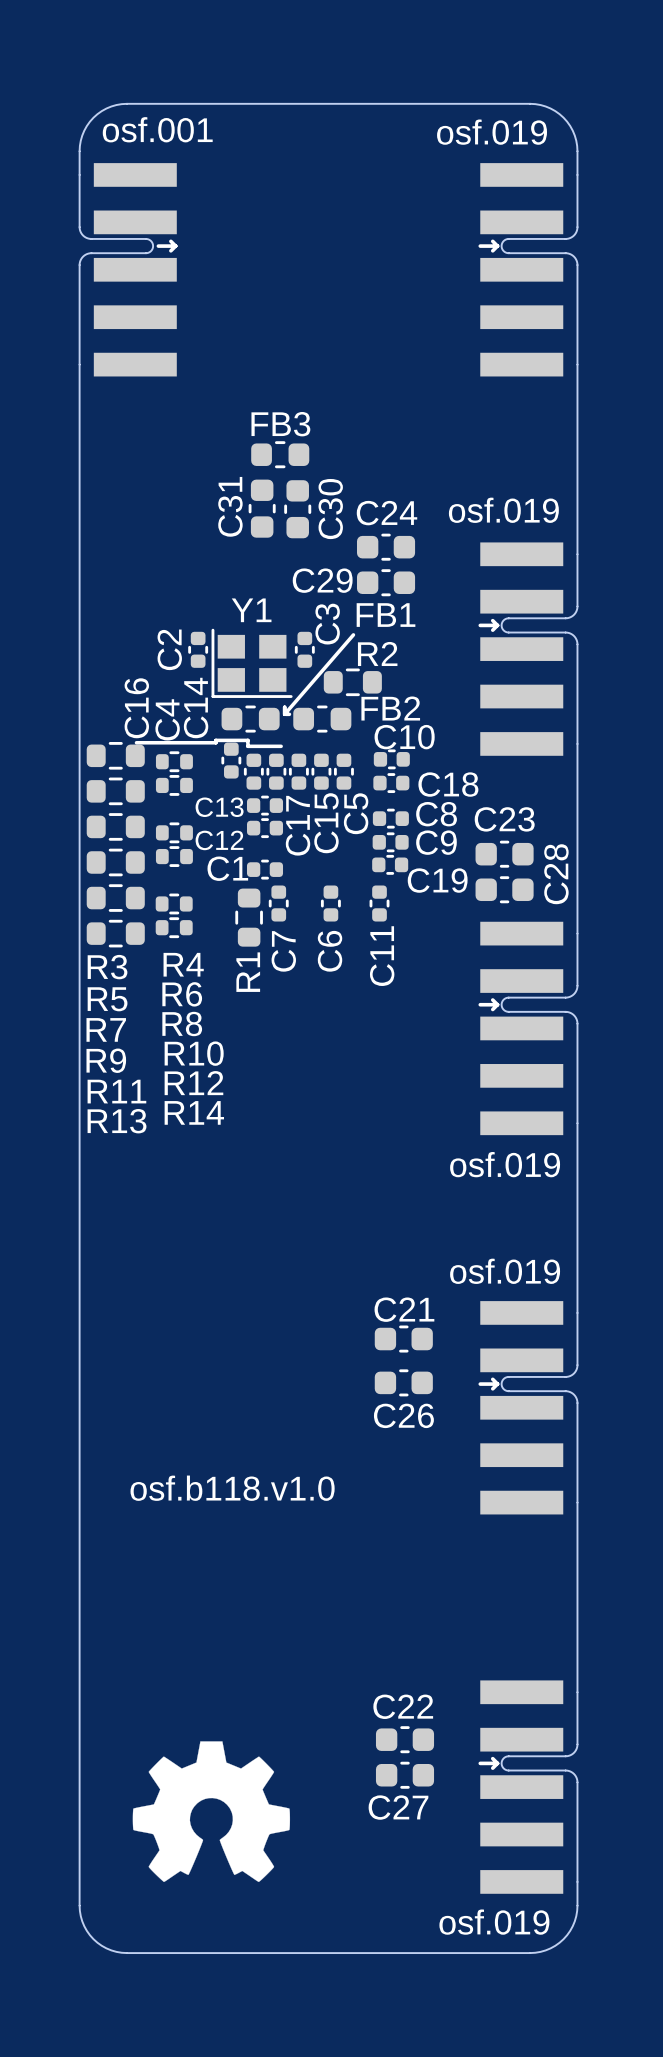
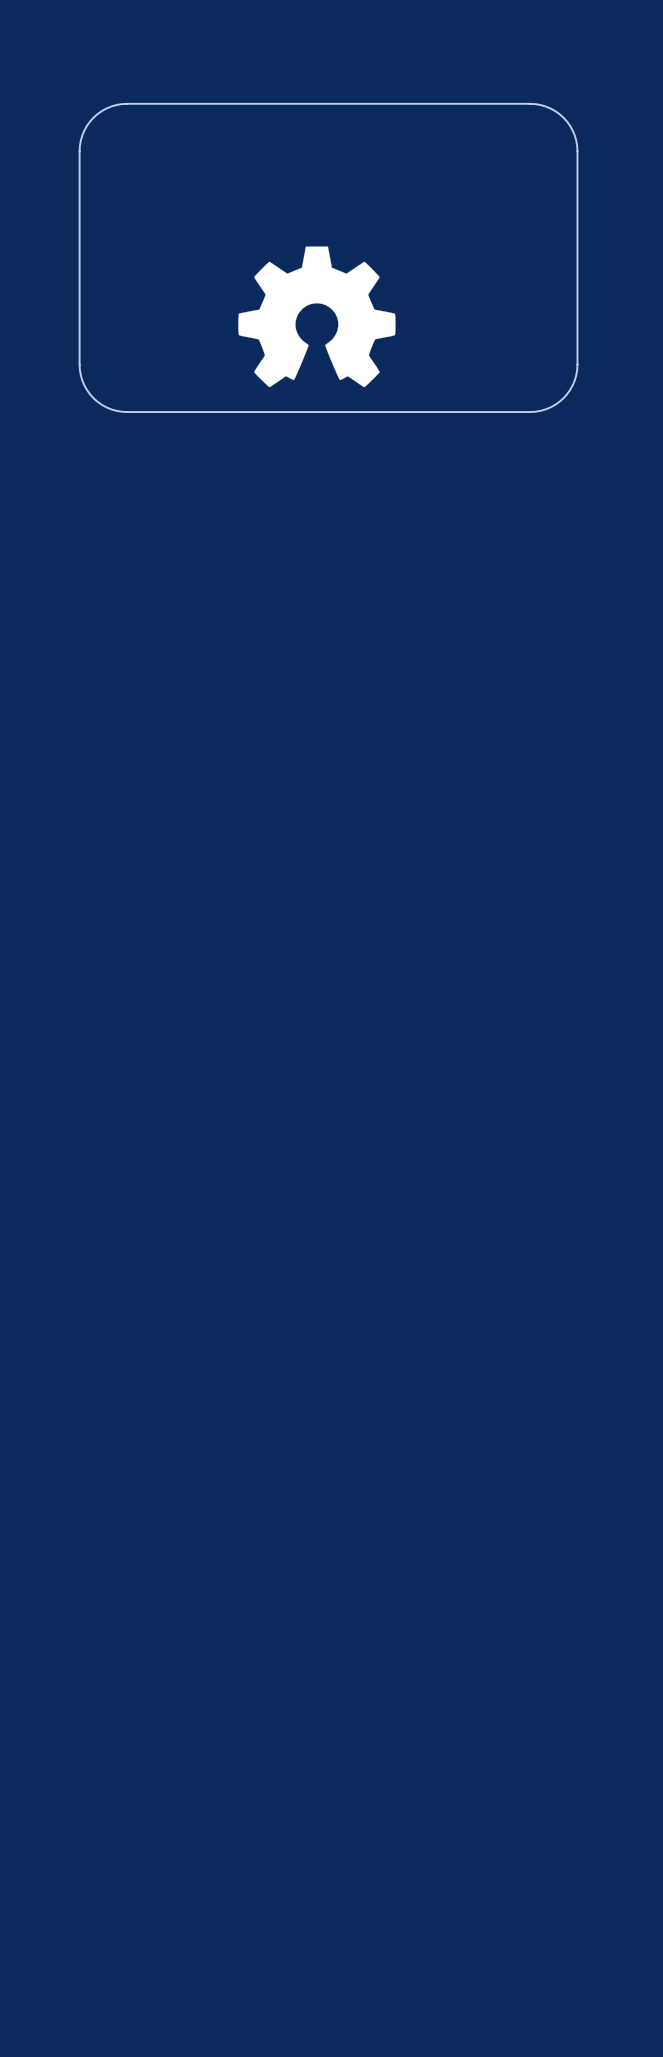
text: osf.001 (157, 129) -> none
text: osf.019 (492, 132) -> none
board edge: none -> (79, 174) (80, 375) (86, 389) (97, 401) (111, 409) (127, 412) (530, 412) (550, 407) (567, 394) (574, 380) (577, 369) (577, 174)
drawing: none -> [238, 246, 396, 388]
part: (128, 269) -> none
part: (528, 269) -> none
board edge: (79, 364) (79, 1905) (82, 1921) (89, 1935) (97, 1942) (106, 1948) (121, 1952) (535, 1952) (555, 1945) (570, 1930) (577, 1910) (577, 1881) -> none
board edge: (577, 364) (577, 554) -> none
FB3: (280, 454) -> none
C31: (262, 508) -> none
C30: (297, 509) -> none
text: osf.019 (503, 510) -> none
C24: (386, 547) -> none
C29: (386, 582) -> none
line: (353, 634) (284, 714) (284, 707) -> none
C2: (198, 649) -> none
C3: (304, 649) -> none
part: (528, 649) -> none
Y1: (252, 663) -> none
R2: (352, 682) -> none
line: (285, 714) (289, 714) -> none
FB1: (250, 719) -> none
FB2: (322, 719) -> none
line: (136, 742) (215, 742) (215, 740) (247, 740) (247, 746) (281, 746) -> none
board edge: (577, 743) (577, 933) -> none
R3: (115, 755) -> none
C10: (391, 759) -> none
C4: (231, 760) -> none
R4: (174, 761) -> none
C16: (253, 771) -> none
C14: (276, 771) -> none
C17: (298, 771) -> none
C15: (321, 771) -> none
C5: (343, 771) -> none
C18: (391, 783) -> none
R6: (174, 785) -> none
R5: (115, 791) -> none
C13: (265, 805) -> none
C8: (390, 818) -> none
R7: (115, 826) -> none
C12: (265, 828) -> none
R8: (174, 832) -> none
C9: (390, 842) -> none
C23: (504, 854) -> none
R10: (174, 856) -> none
R9: (115, 862) -> none
C19: (390, 864) -> none
C1: (265, 869) -> none
C28: (504, 889) -> none
R11: (115, 898) -> none
R12: (174, 903) -> none
C7: (278, 903) -> none
C6: (330, 903) -> none
C11: (379, 903) -> none
R1: (249, 917) -> none
R14: (174, 927) -> none
R13: (115, 933) -> none
part: (528, 1028) -> none
board edge: (577, 1123) (577, 1312) -> none
text: osf.019 (505, 1164) -> none
text: osf.019 (505, 1271) -> none
C21: (403, 1339) -> none
C26: (403, 1382) -> none
part: (528, 1407) -> none
text: osf.b118.v1.0 (232, 1488) -> none
board edge: (577, 1502) (577, 1692) -> none
C22: (405, 1739) -> none
drawing: [132, 1741, 291, 1883] -> none
C27: (405, 1775) -> none
part: (528, 1787) -> none
text: osf.019 (494, 1922) -> none

